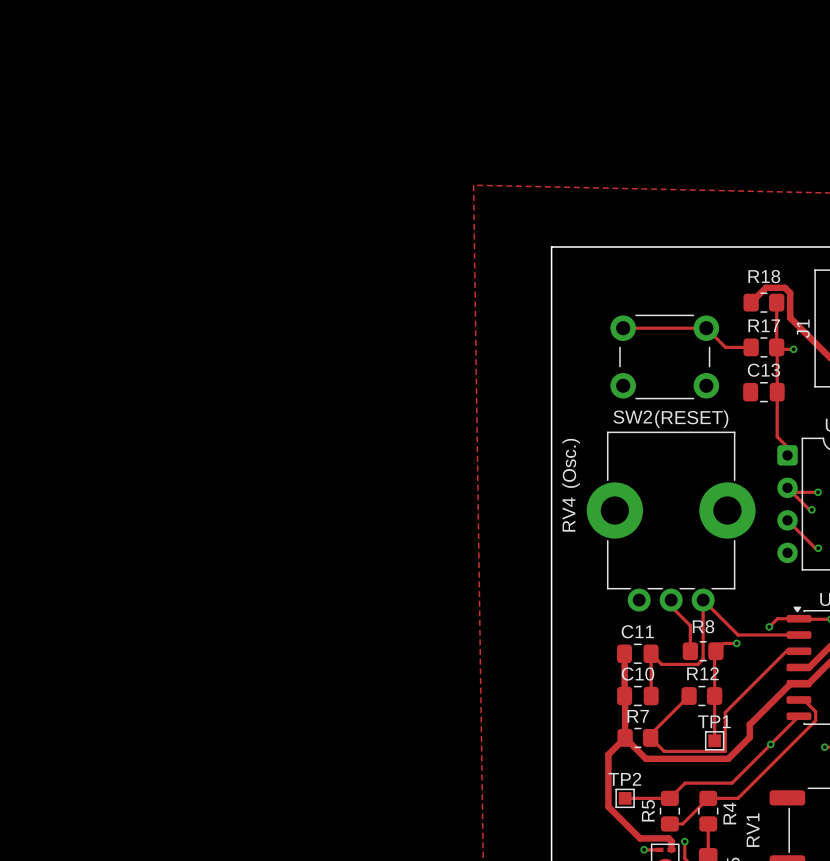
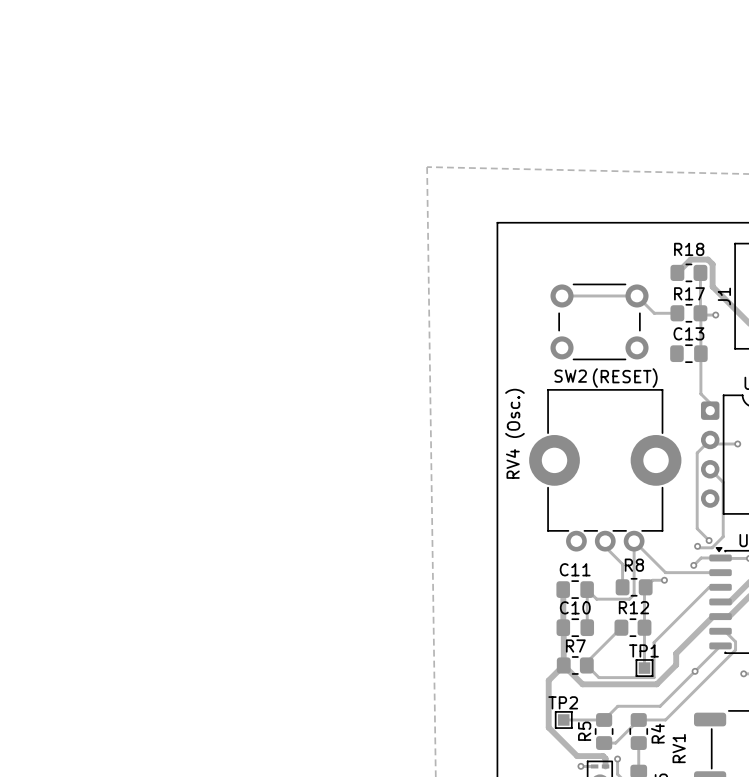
track: none -> (710, 439) (697, 452) (697, 528) (709, 540)
track: (791, 492) (809, 509) (811, 509) -> none
via: (811, 509) -> none
track: (801, 534) (815, 548) (818, 548) -> (723, 482) (723, 536) (712, 547) (697, 546)
via: (818, 548) -> none
via: none -> (709, 540)
via: none -> (697, 546)

